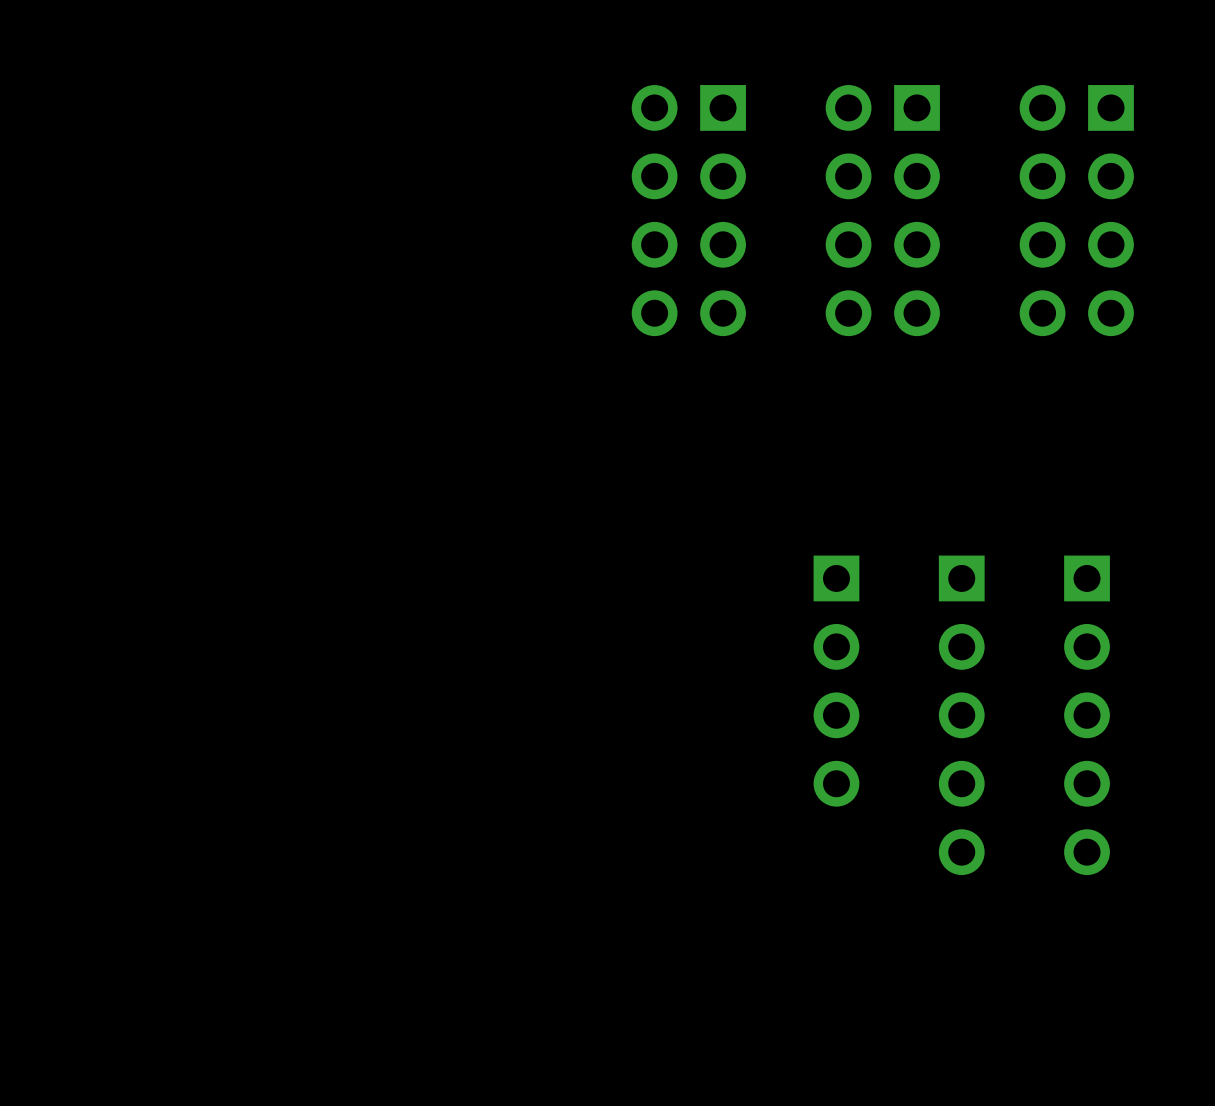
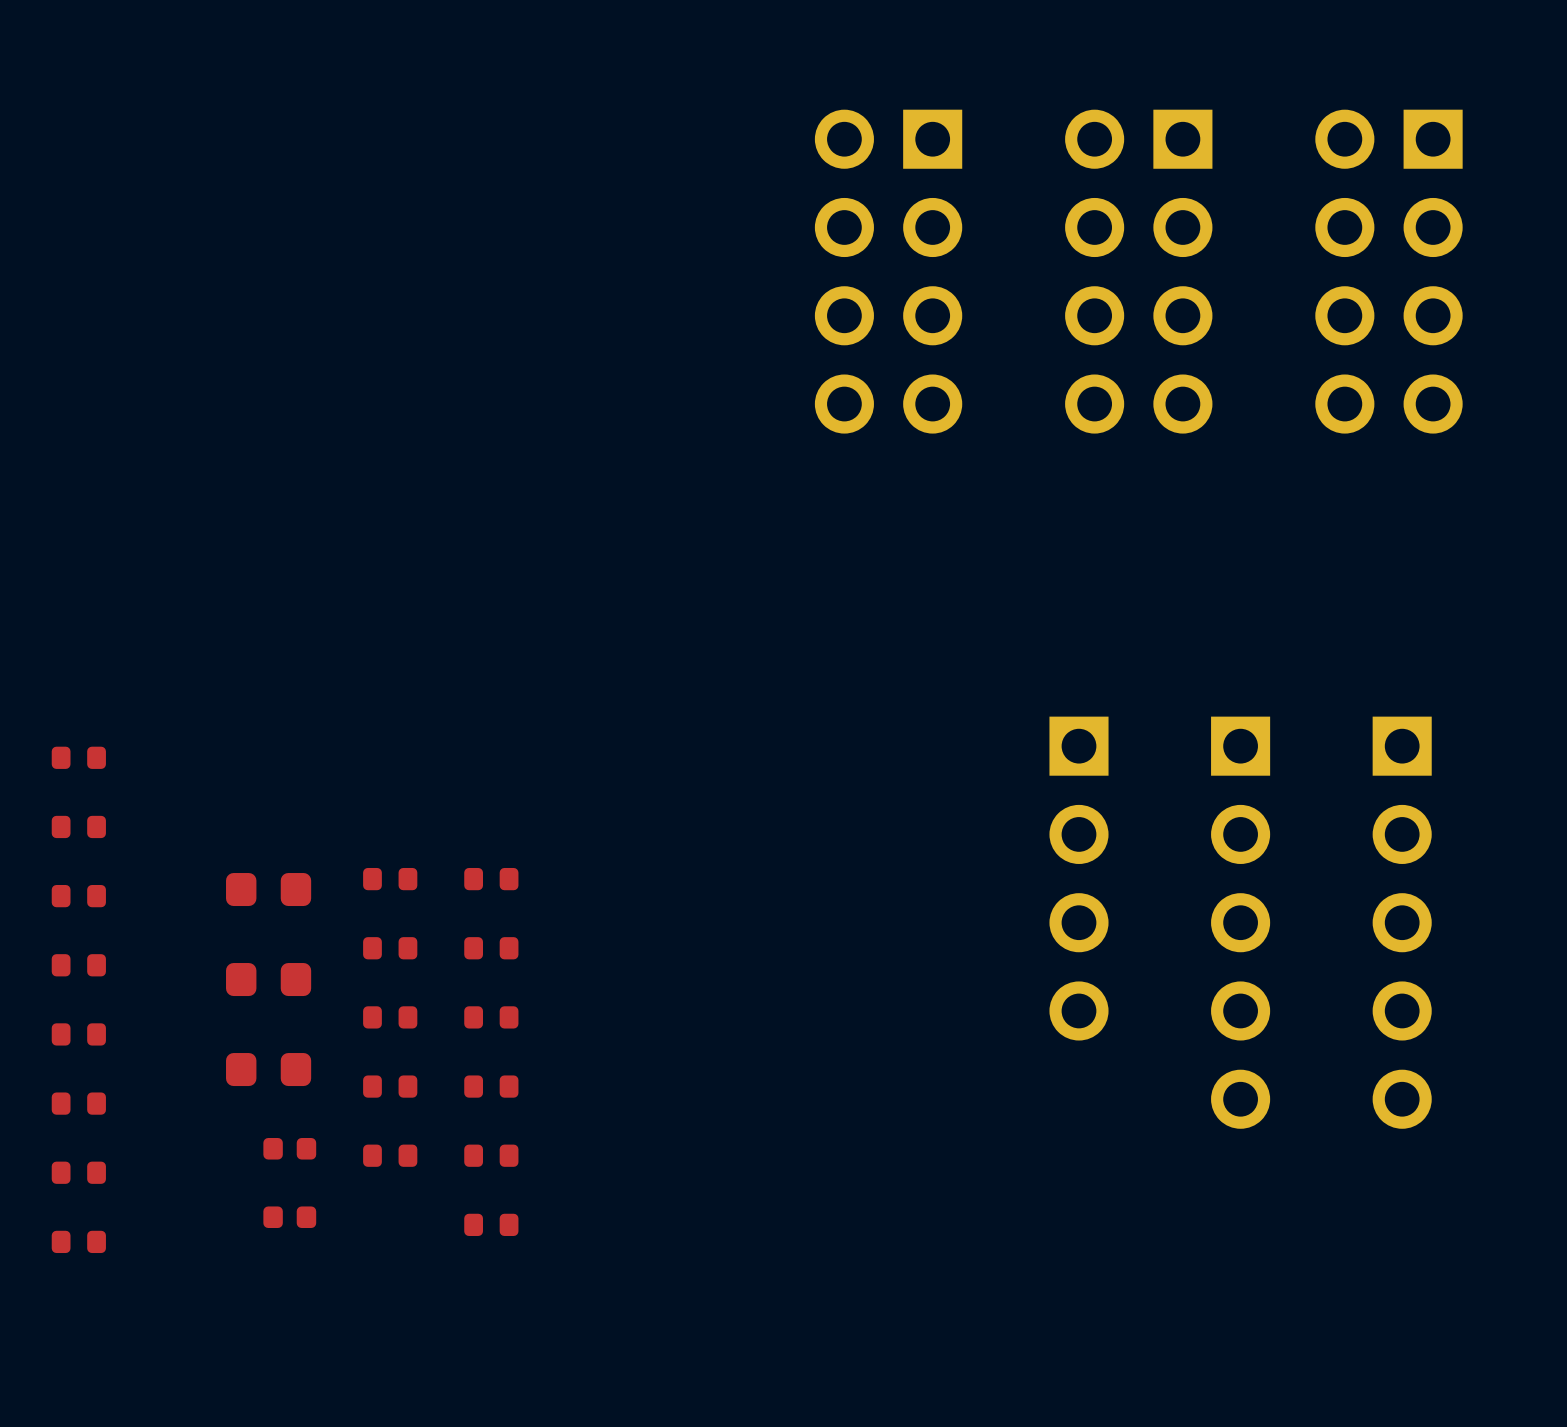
part: none -> (78, 757)
part: none -> (78, 826)
part: none -> (390, 879)
part: none -> (491, 879)
part: none -> (268, 889)
part: none -> (78, 896)
part: none -> (390, 948)
part: none -> (491, 948)
part: none -> (78, 965)
part: none -> (268, 979)
part: none -> (390, 1017)
part: none -> (491, 1017)
part: none -> (78, 1034)
part: none -> (268, 1069)
part: none -> (390, 1086)
part: none -> (491, 1086)
part: none -> (78, 1103)
part: none -> (289, 1148)
part: none -> (390, 1155)
part: none -> (491, 1155)
part: none -> (78, 1172)
part: none -> (289, 1217)
part: none -> (491, 1224)
part: none -> (78, 1241)

